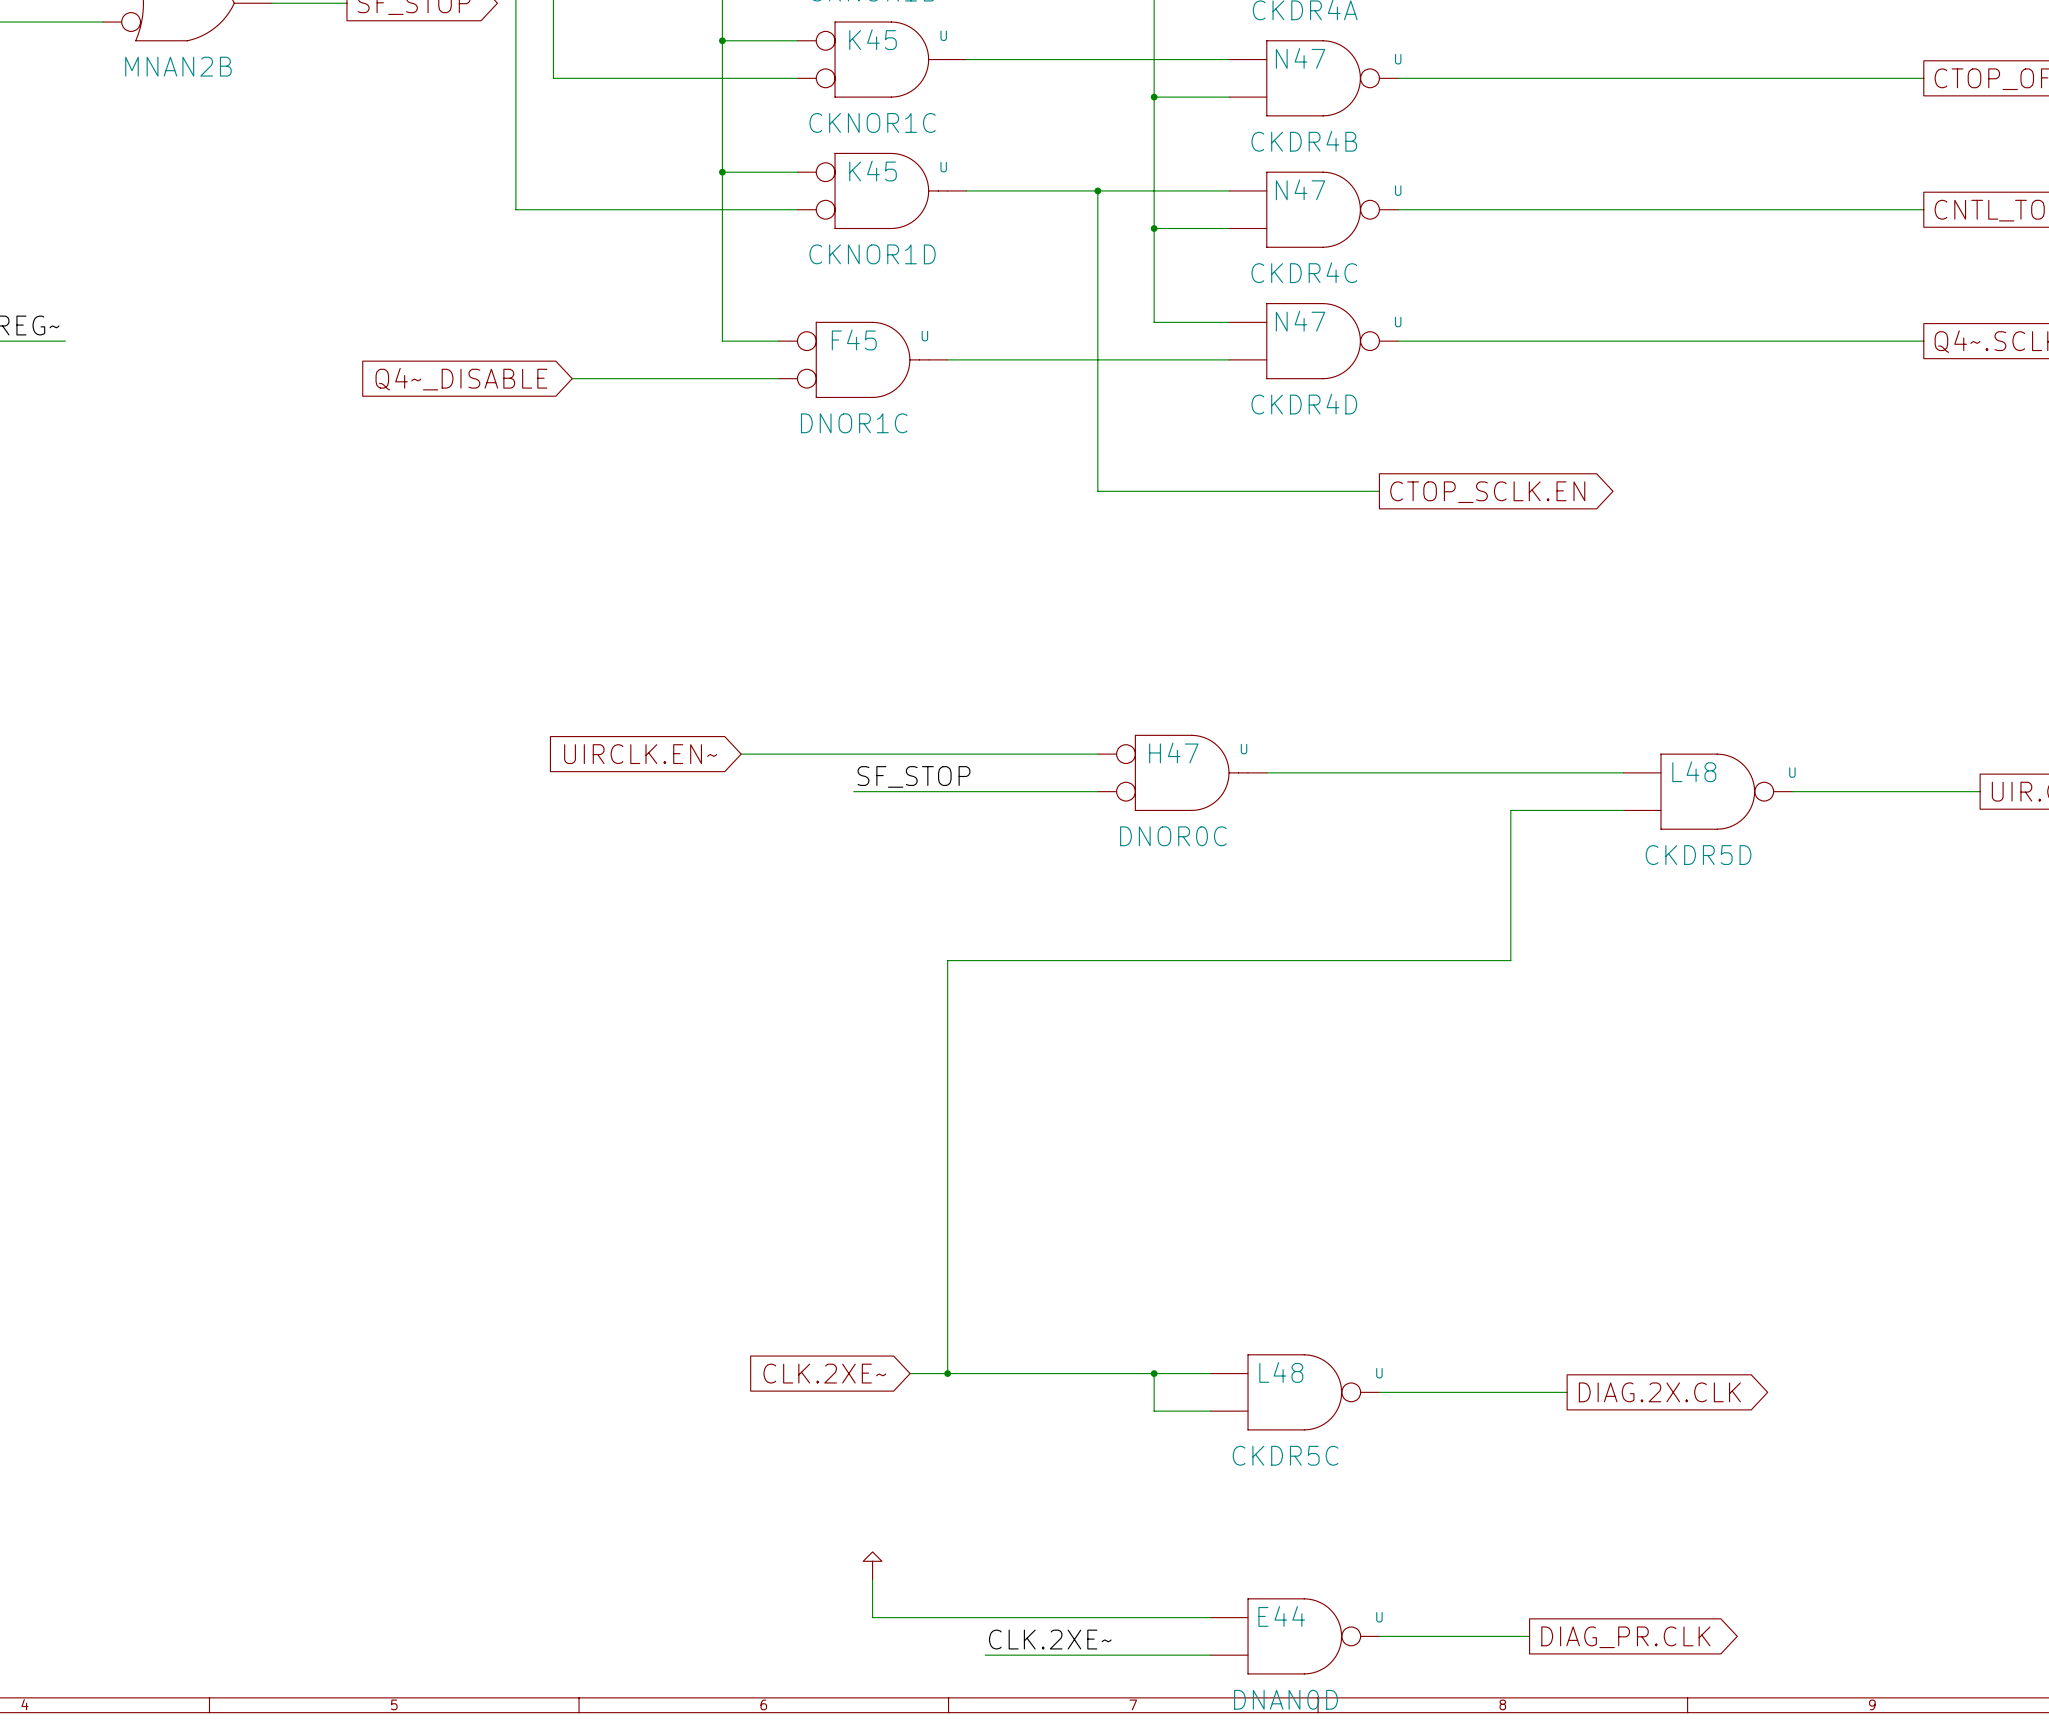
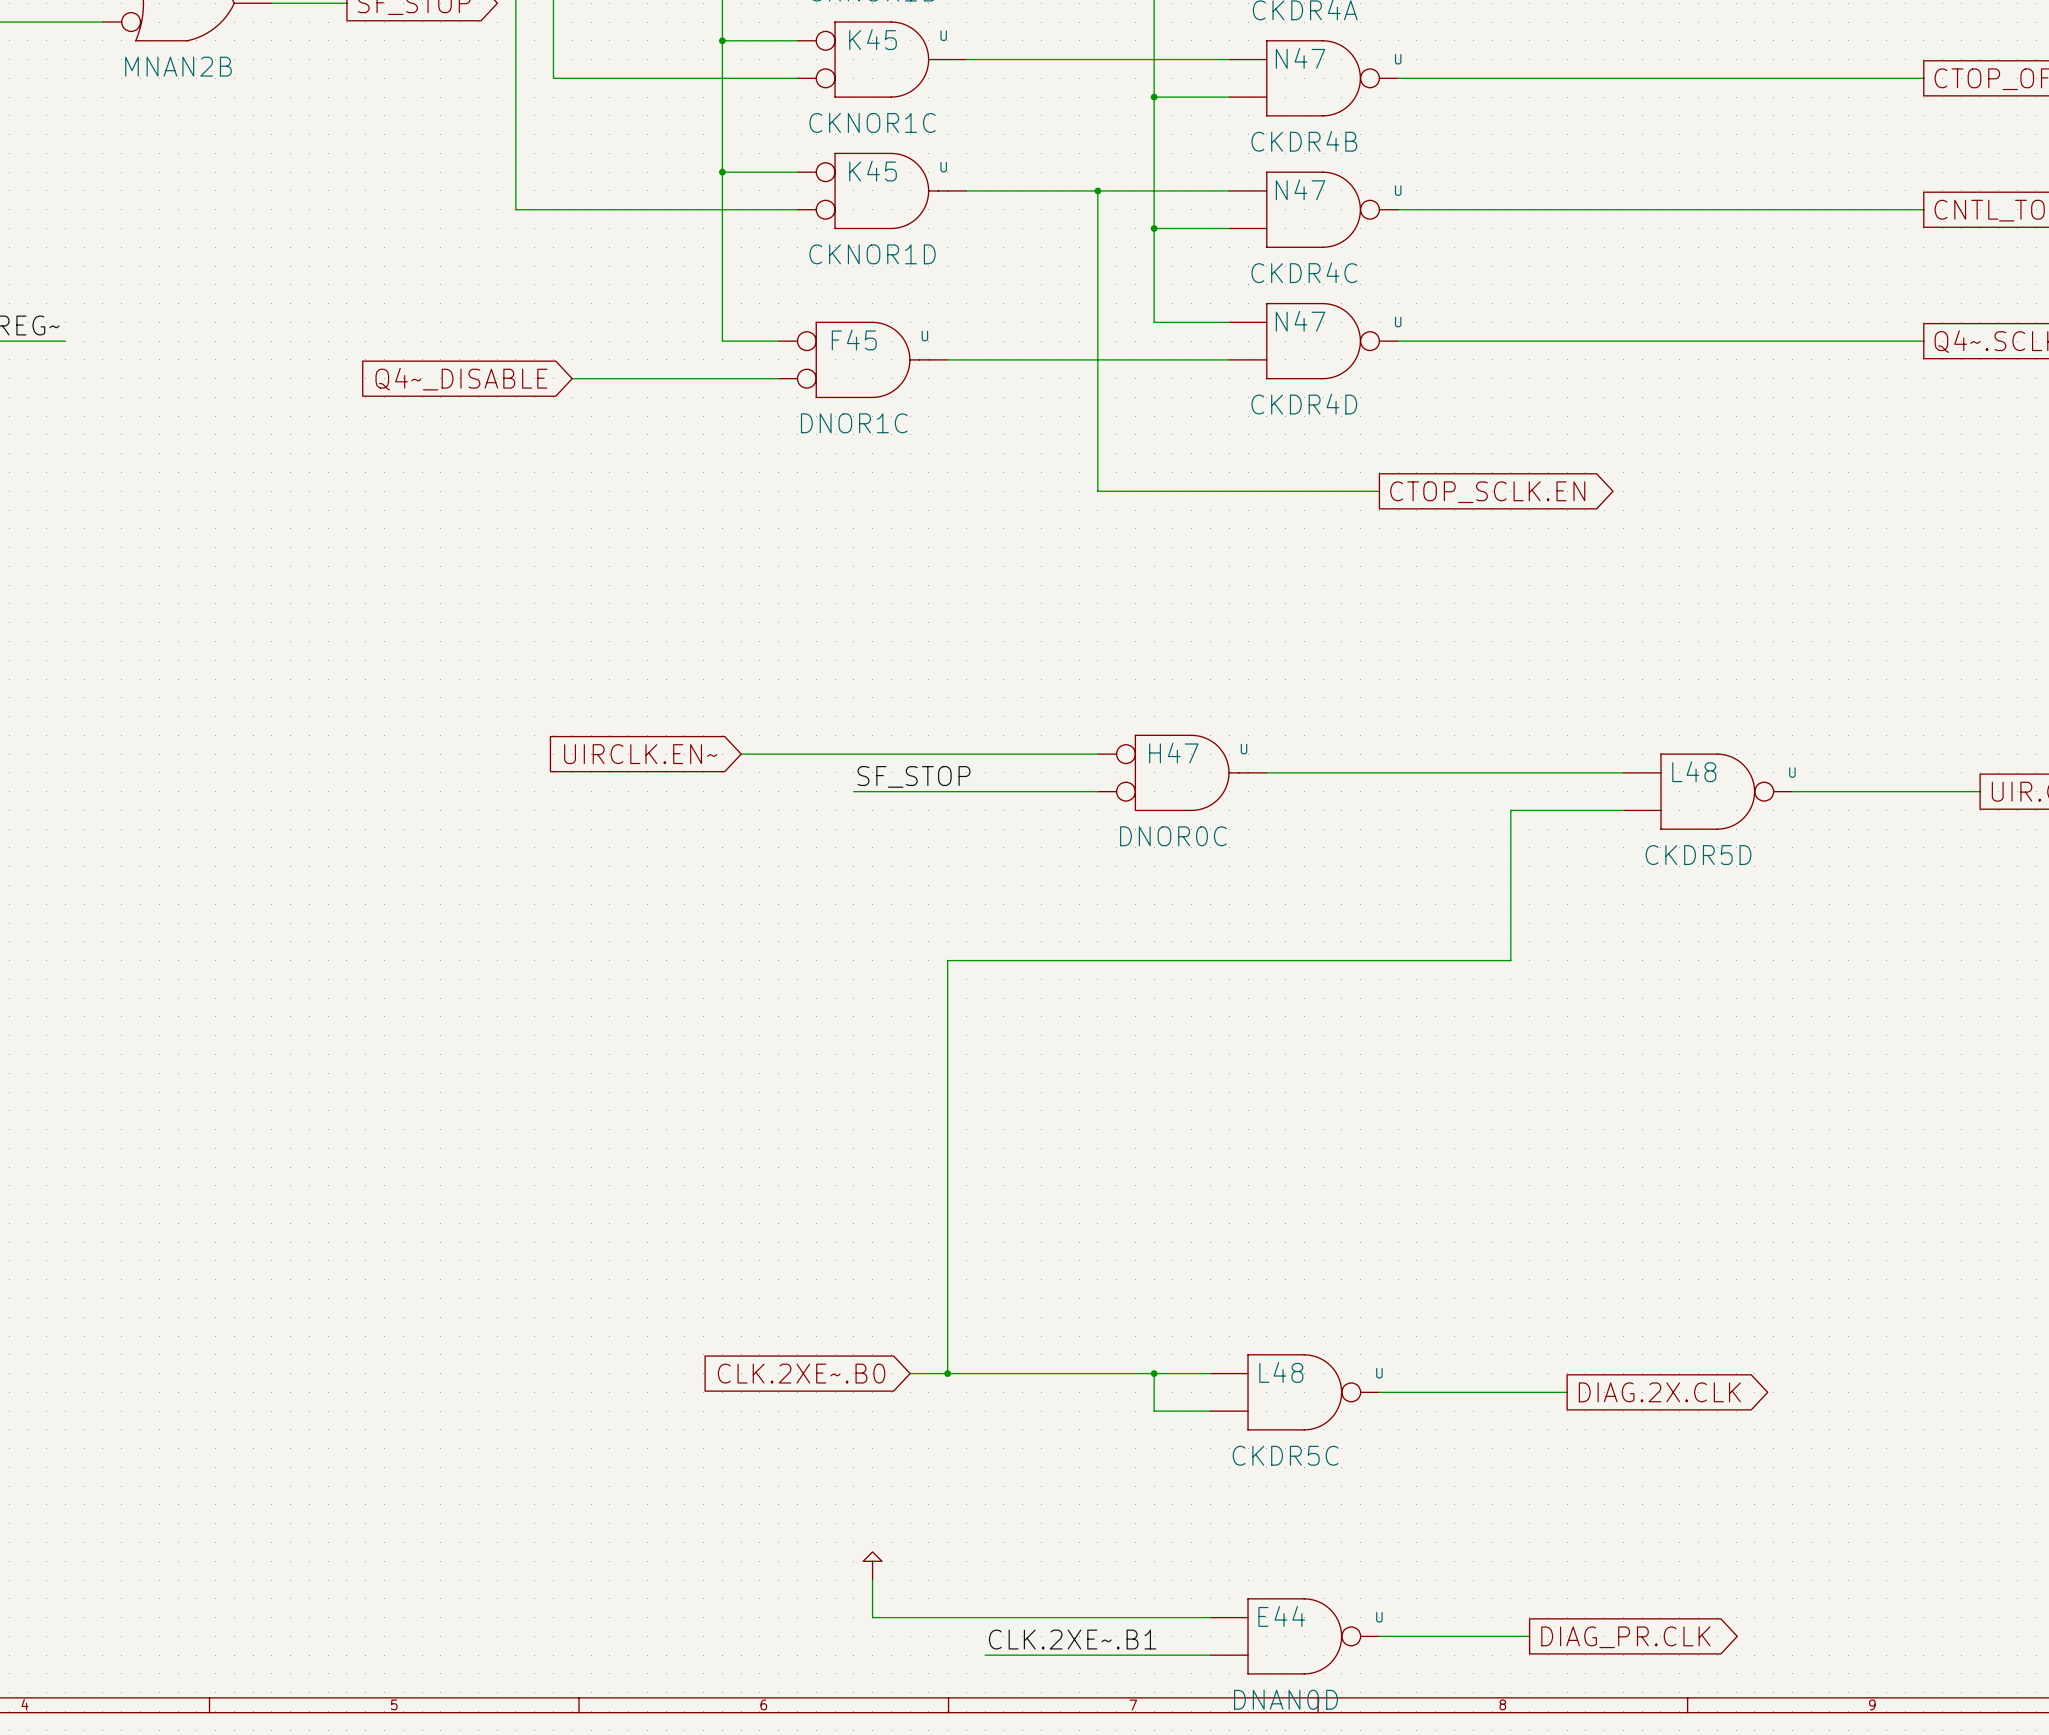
global label: CLK.2XE~ (824, 1373) -> CLK.2XE~.B0 (801, 1373)
label: CLK.2XE~ (1050, 1639) -> CLK.2XE~.B1 (1072, 1639)

